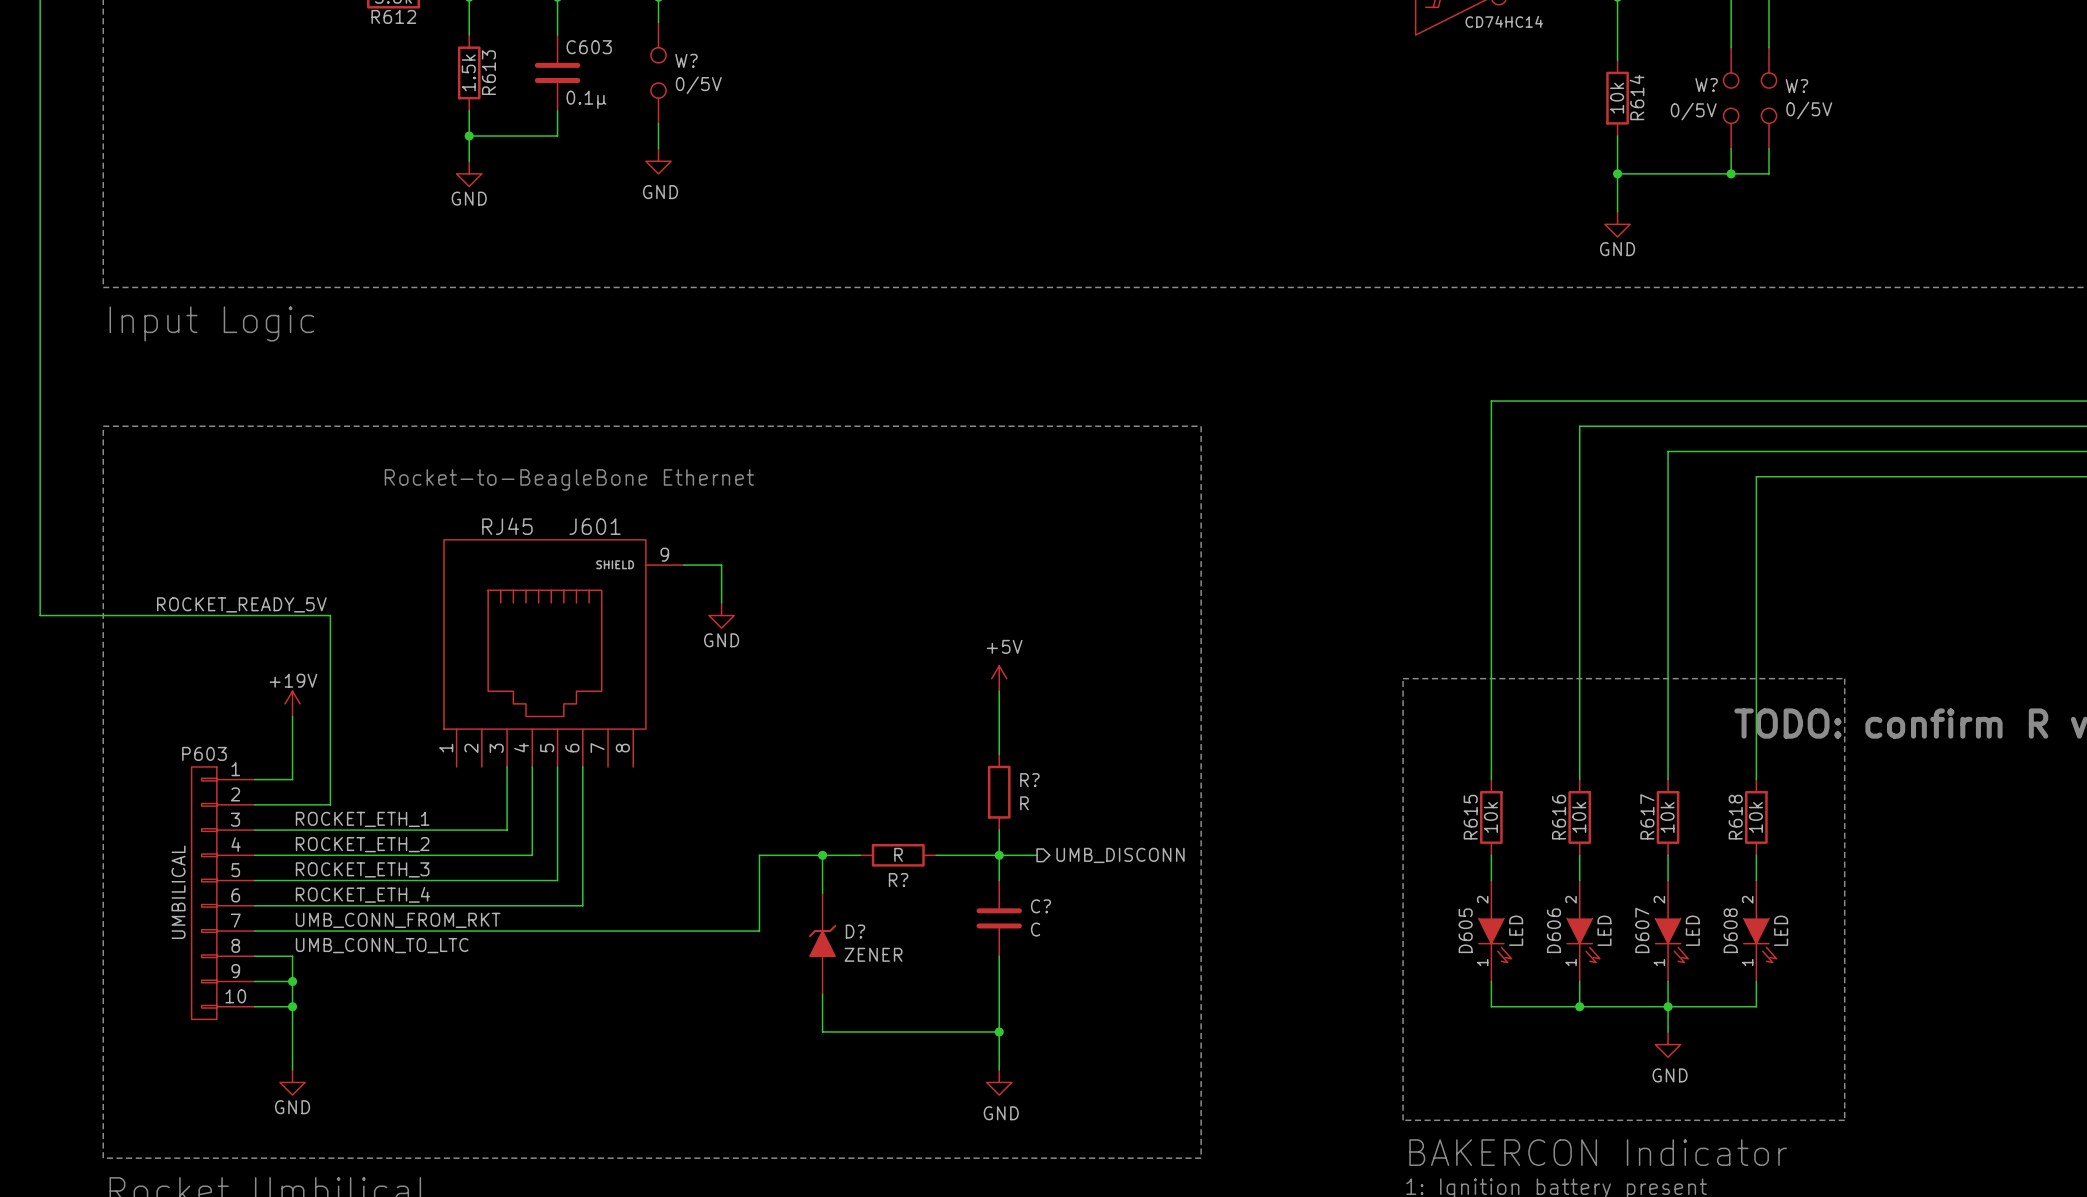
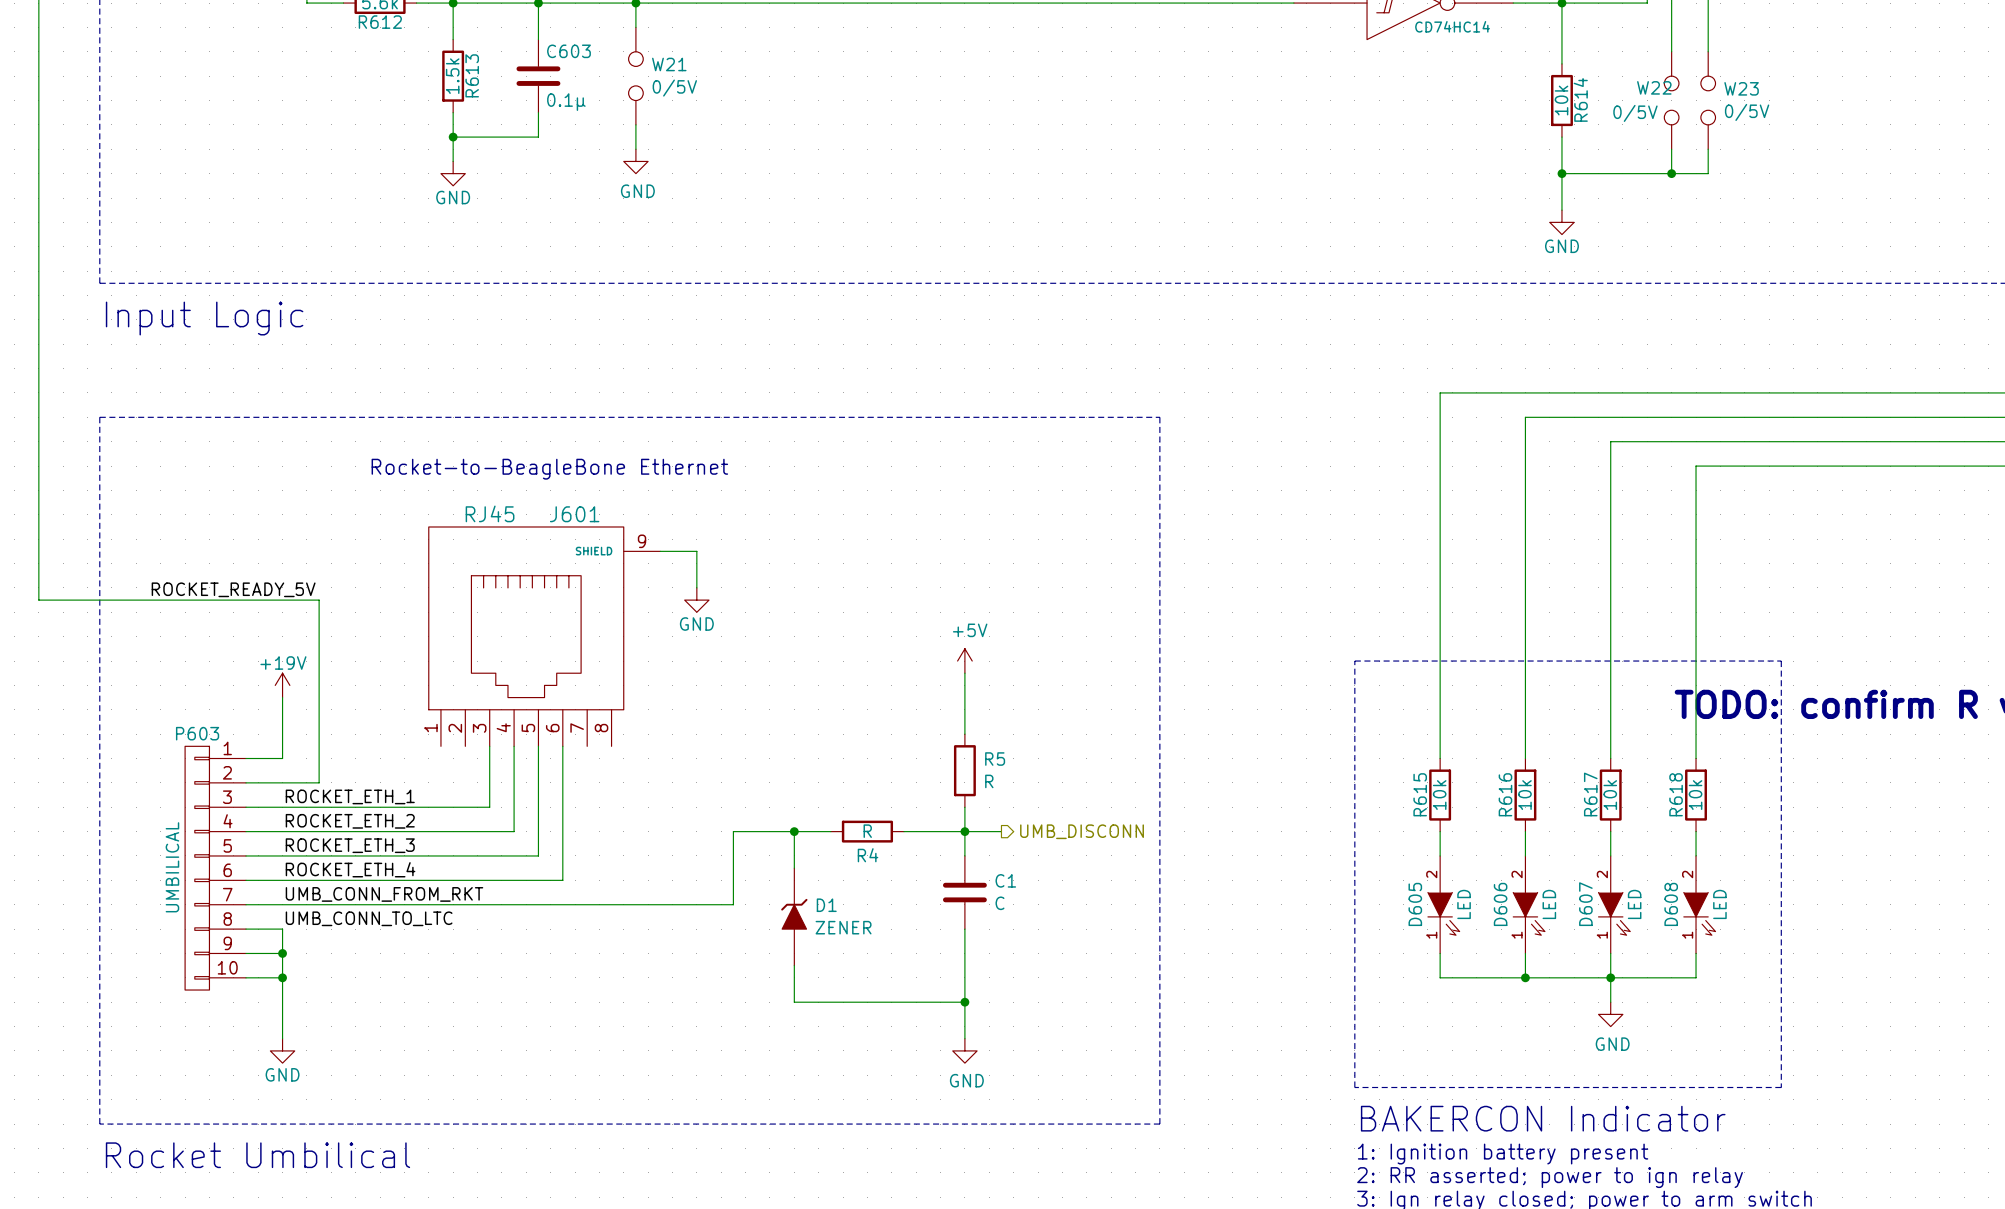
W? name: W? (686, 60) -> W21 (669, 64)
W? name: W? (1706, 85) -> W22 (1654, 87)
W? name: W? (1796, 86) -> W23 (1741, 88)
R? name: R? (1029, 780) -> R5 (995, 759)
R? name: R? (898, 880) -> R4 (868, 855)
C? name: C? (1040, 906) -> C1 (1005, 880)
D? name: D? (855, 931) -> D1 (826, 905)

